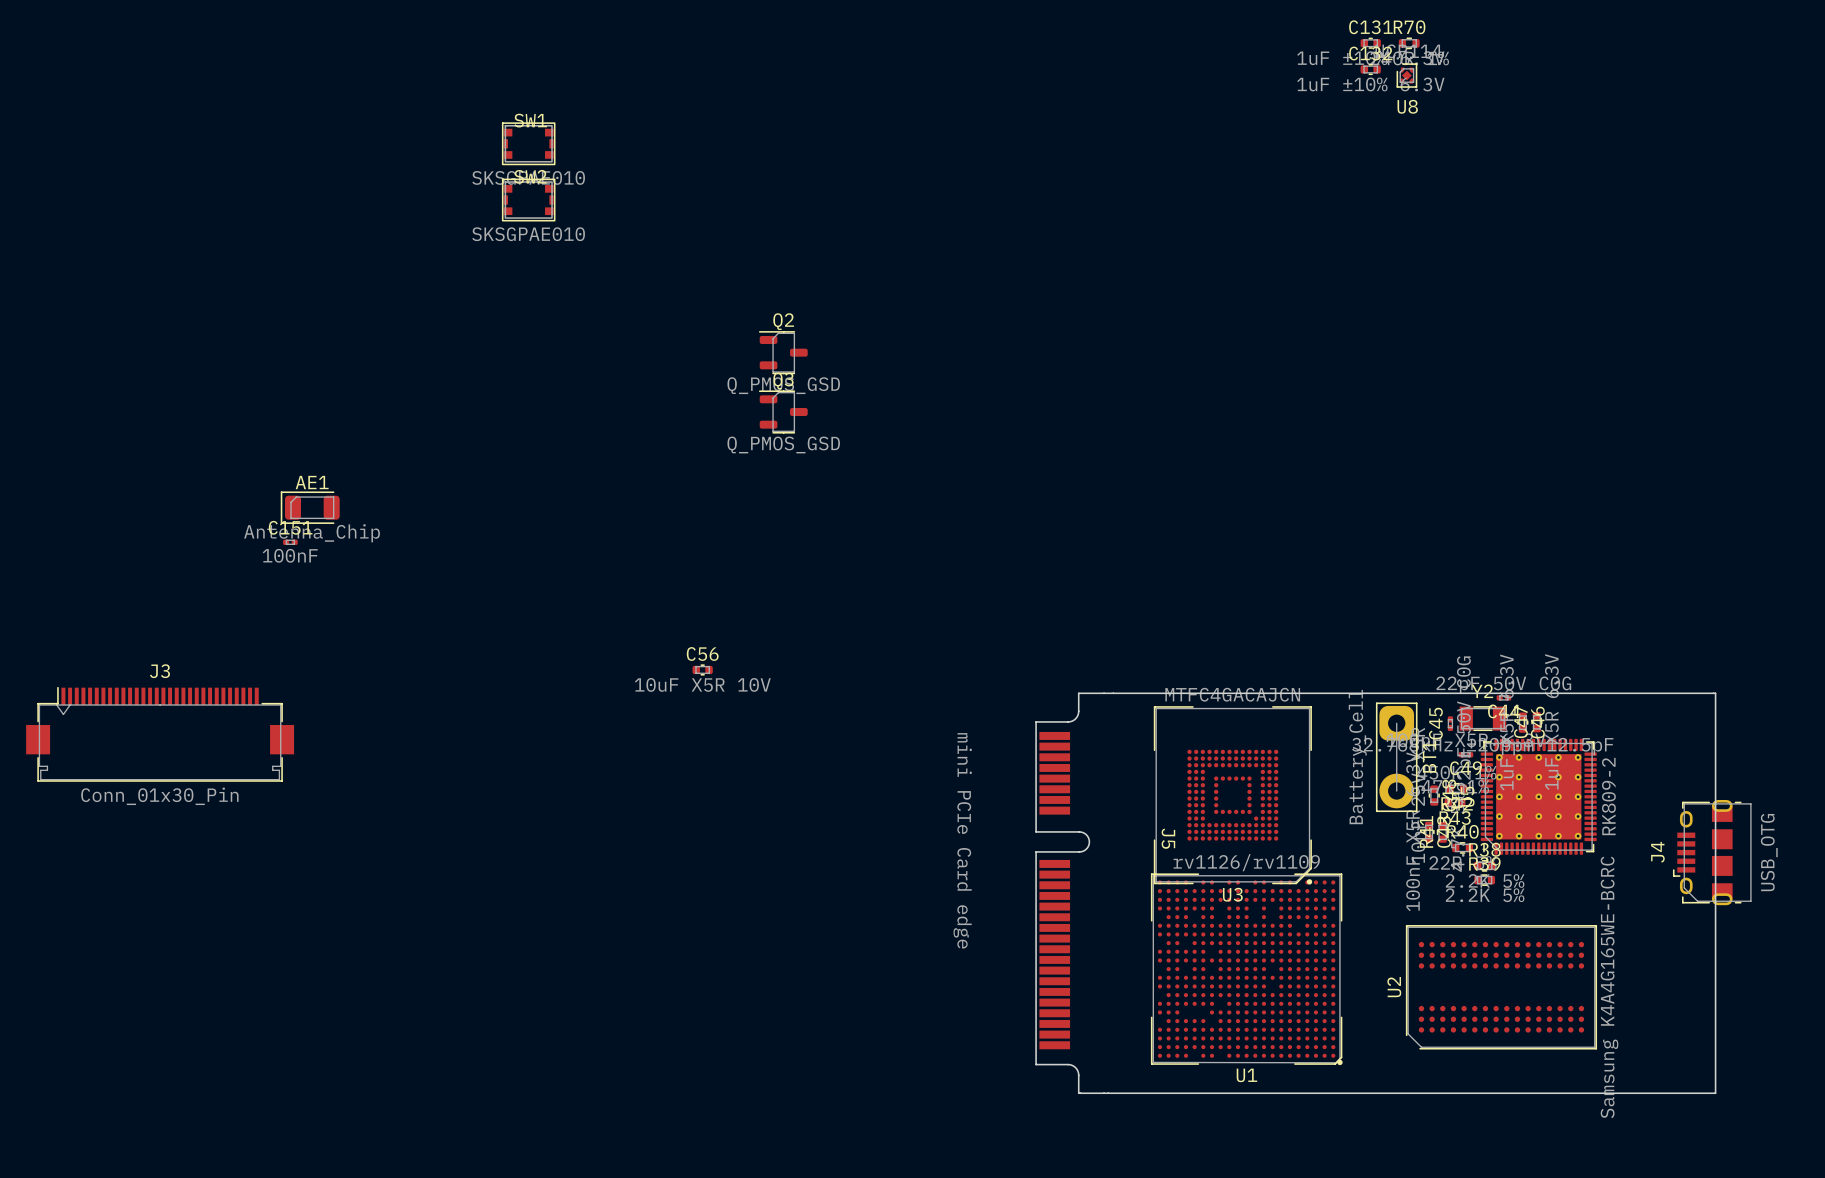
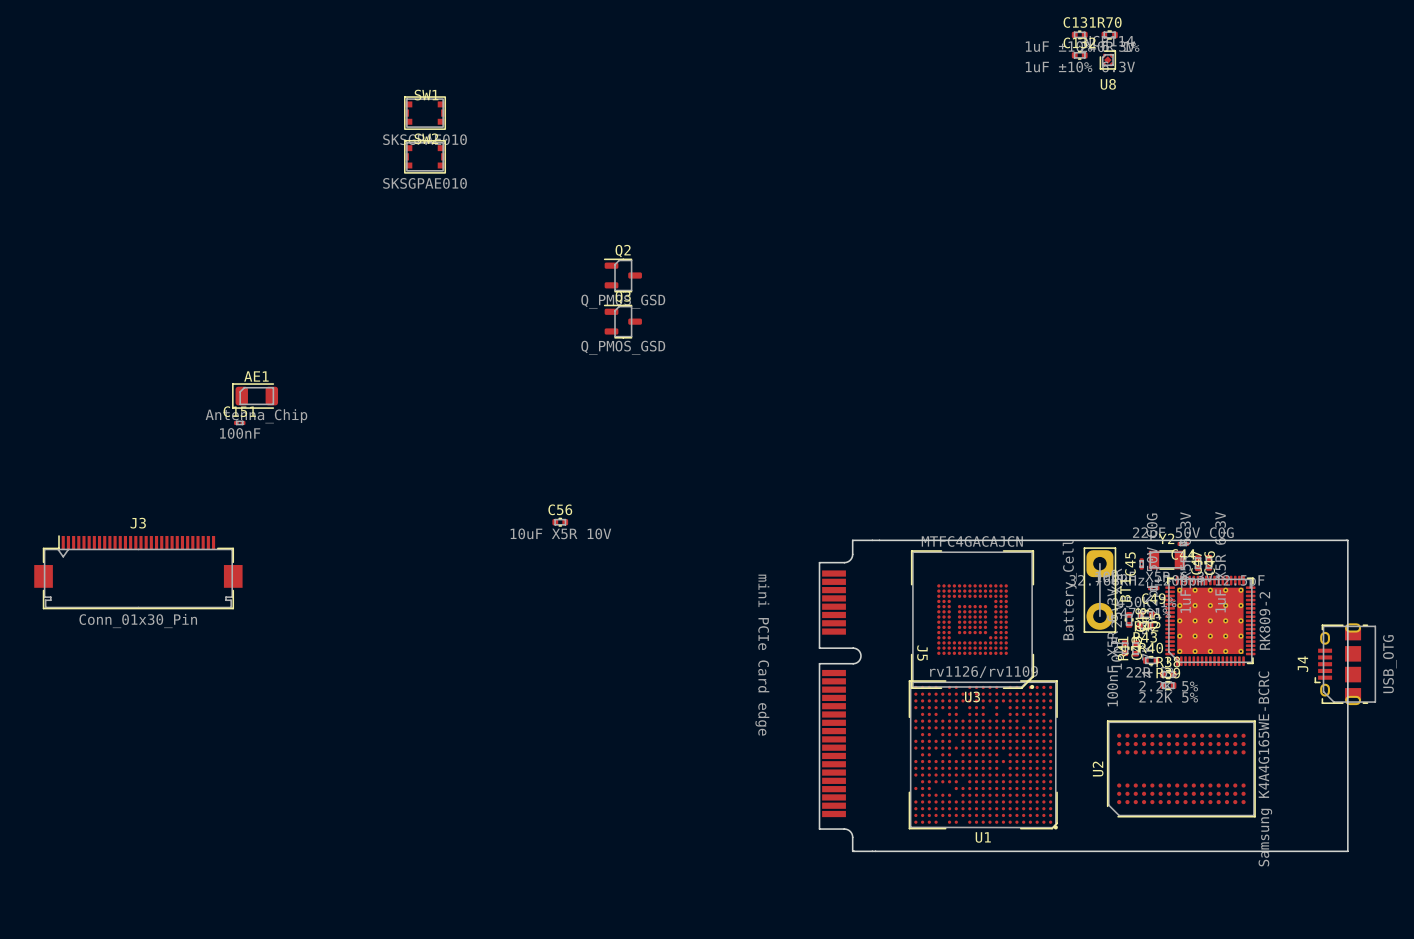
U3 footprint: [1153, 706, 1313, 885] -> [911, 550, 1035, 690]
U1 footprint: [1150, 873, 1343, 1066] -> [908, 680, 1058, 830]

